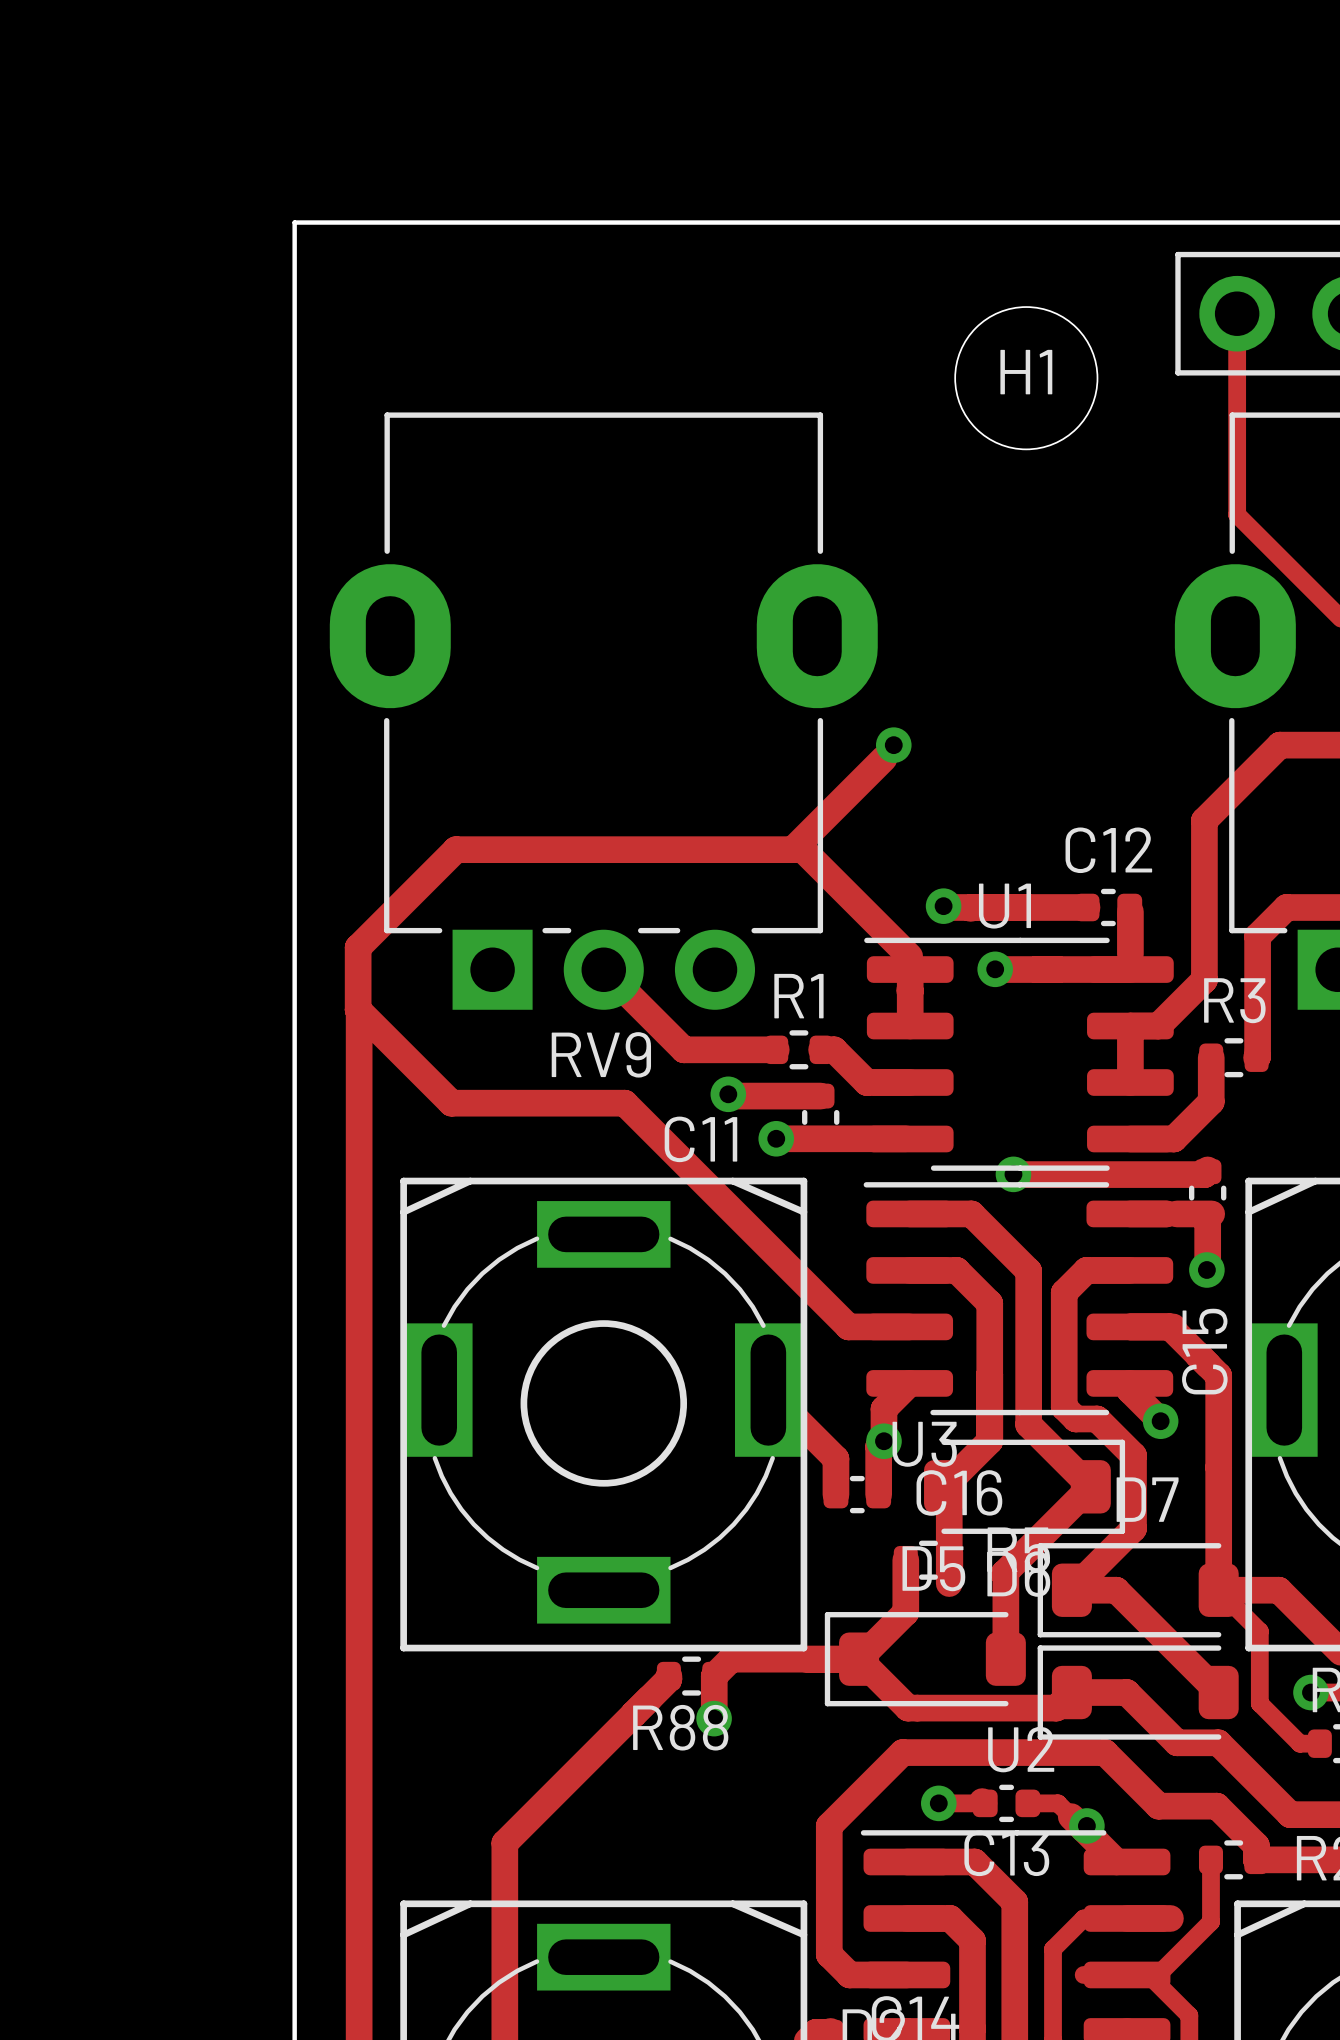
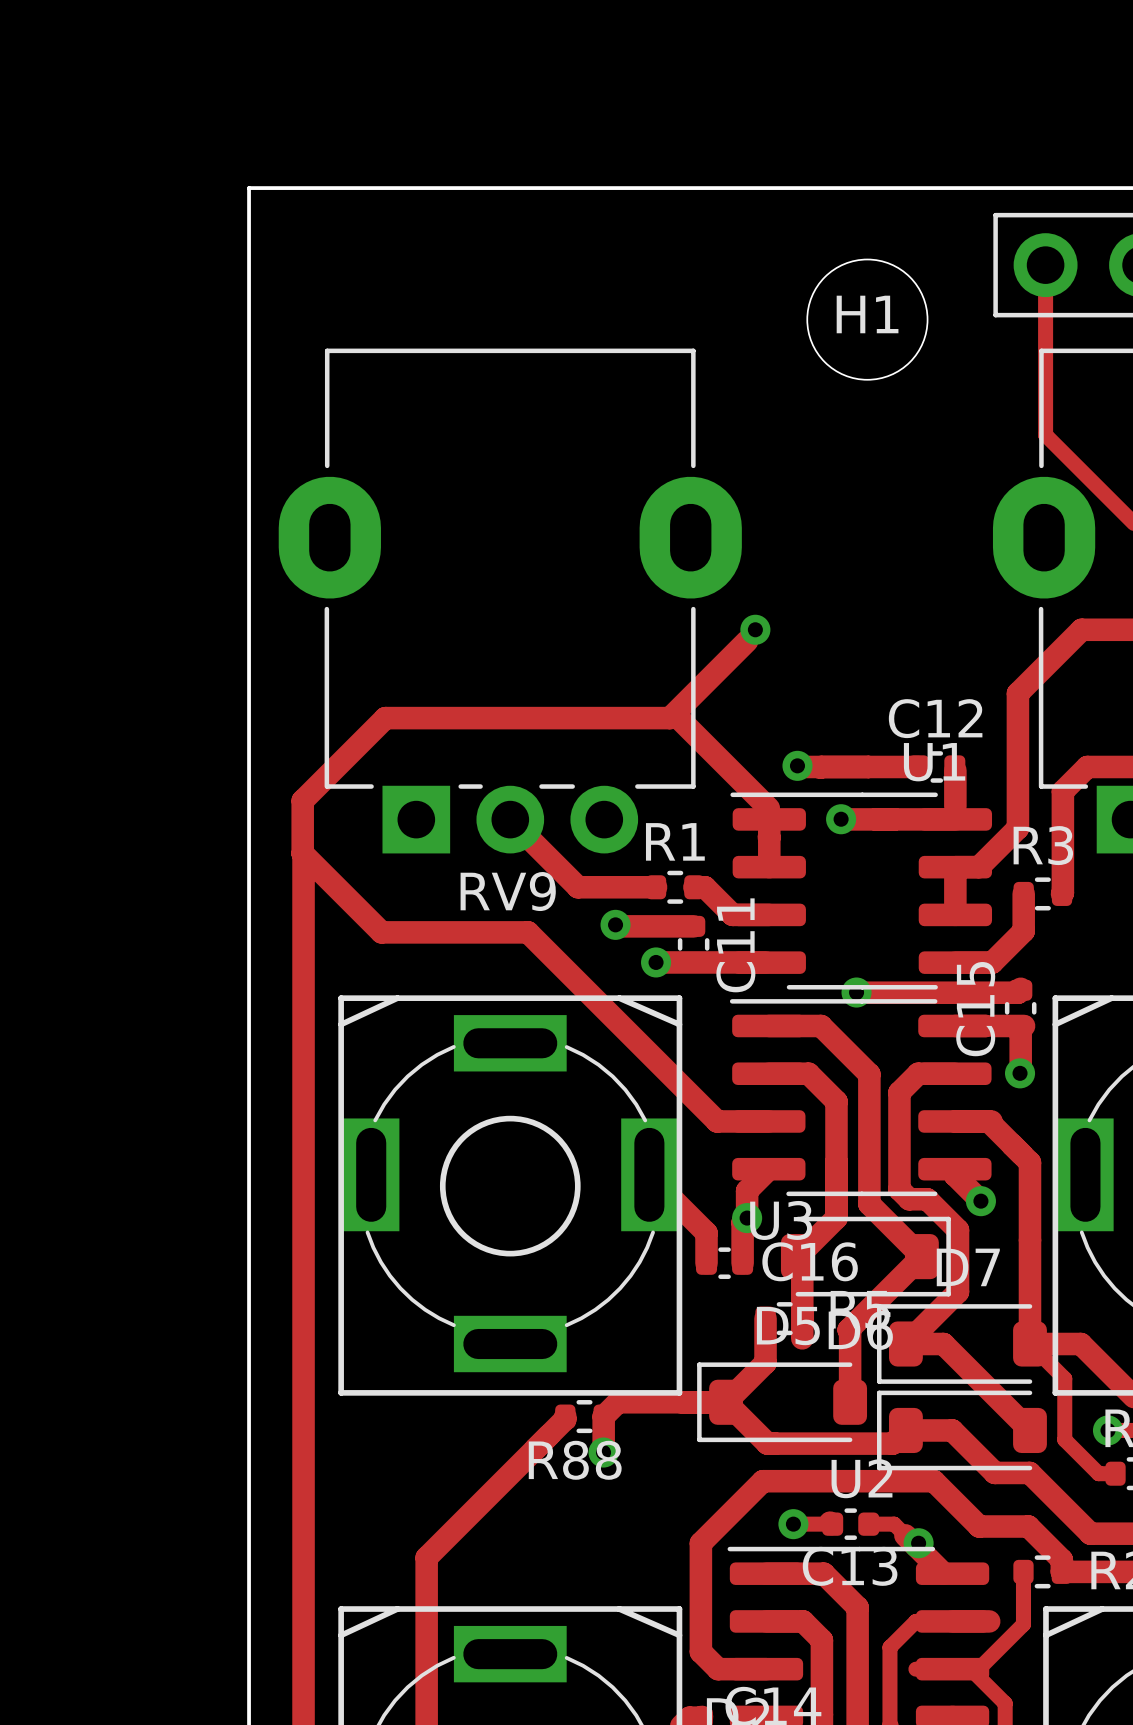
U1 name position: U1 (1004, 906) -> U1 (934, 762)
C11 name rotation: 0° (700, 1139) -> 90° counterclockwise (735, 945)
C11 name position: C11 (700, 1139) -> C11 (735, 945)
C15 name position: C15 (1204, 1351) -> C15 (975, 1009)

